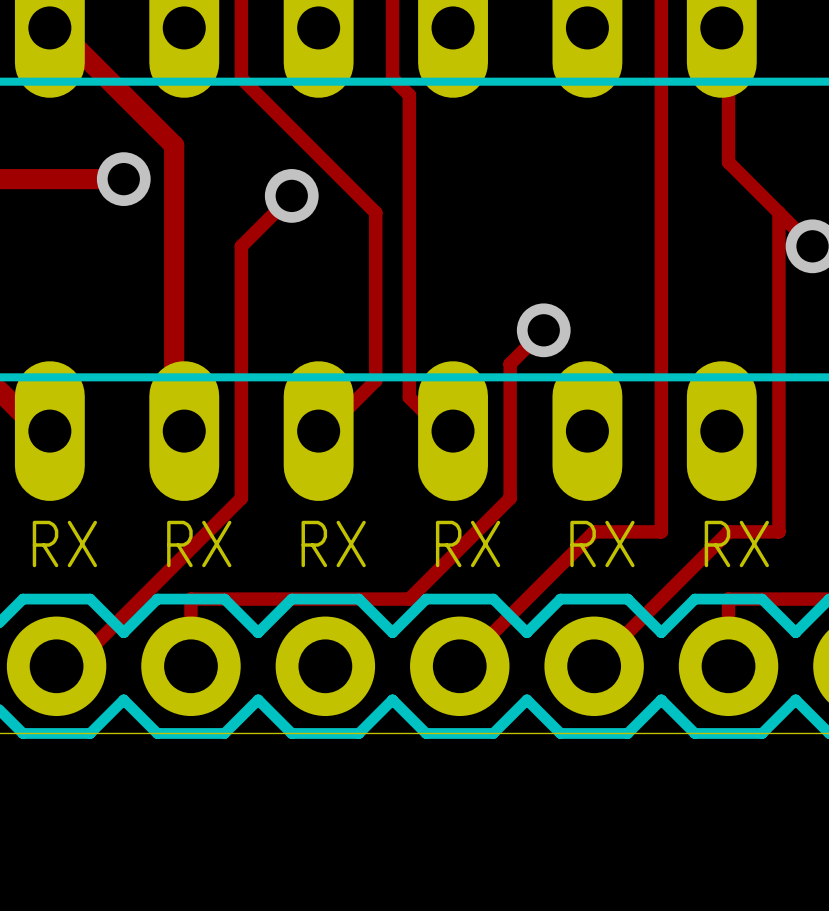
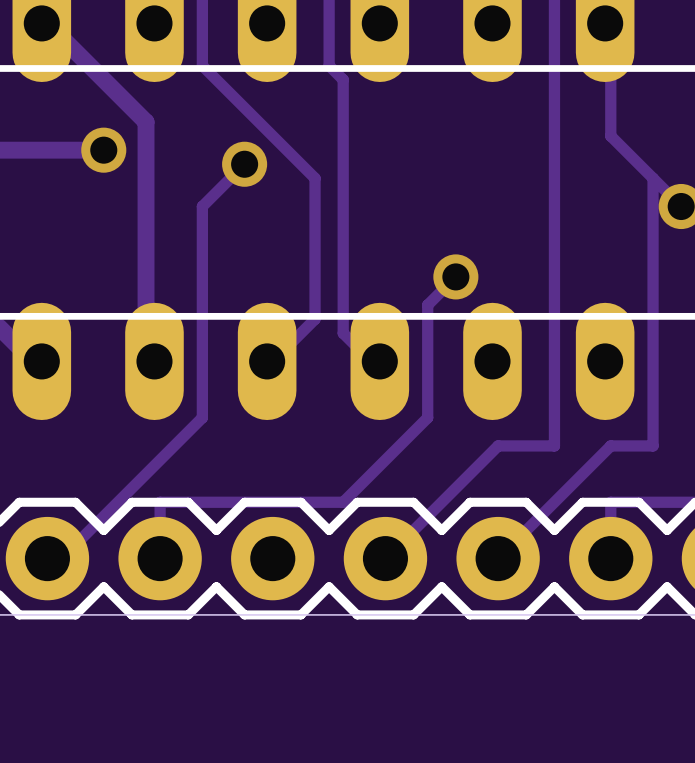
text: RX (64, 543) -> none
text: RX (199, 543) -> none
text: RX (333, 543) -> none
text: RX (468, 543) -> none
text: RX (602, 543) -> none
text: RX (736, 543) -> none

